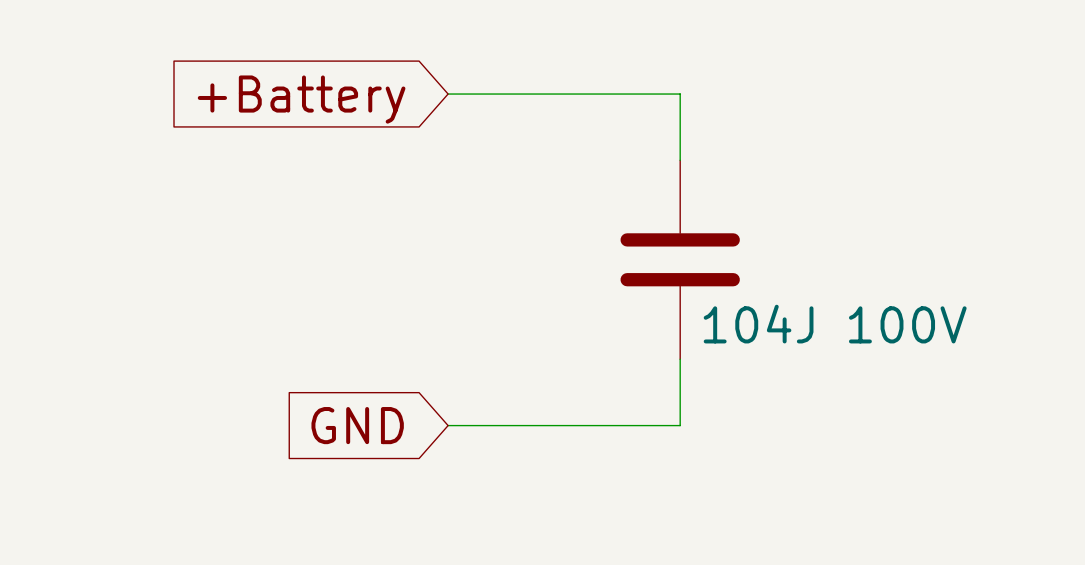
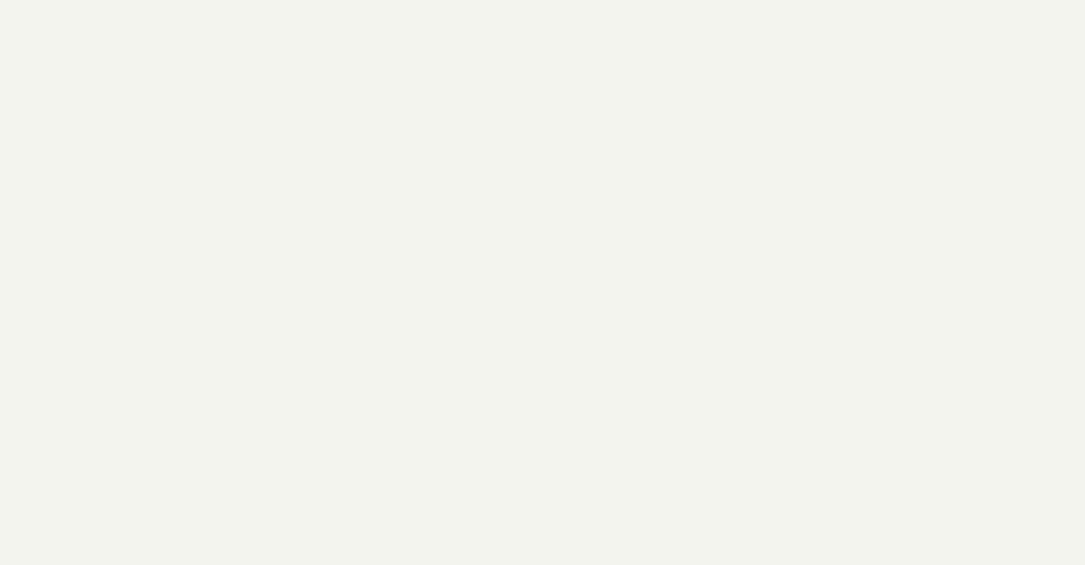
wire: (448, 94) (680, 94) (680, 160) -> none
global label: +Battery (301, 99) -> none
part: 104J 100V (680, 259) -> none
wire: (680, 359) (680, 425) (448, 425) -> none
global label: GND (357, 425) -> none

